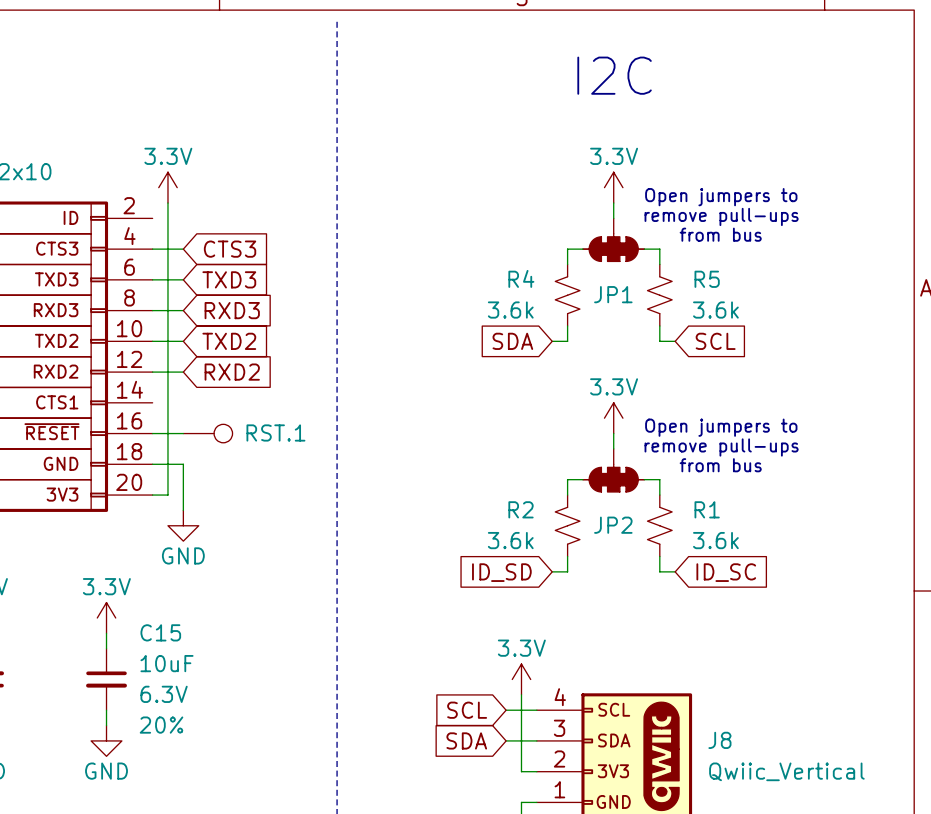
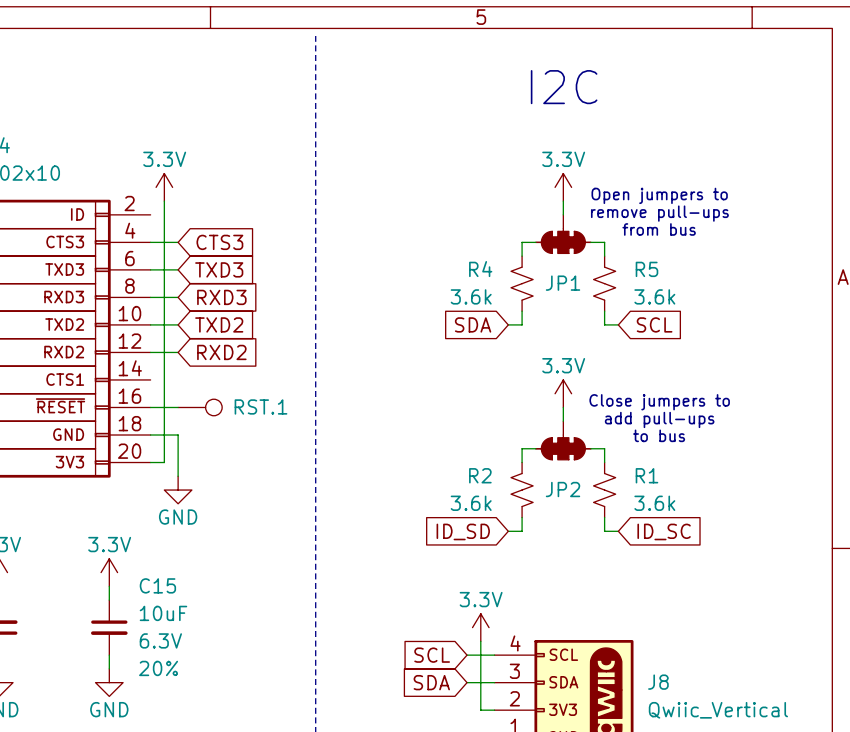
text: Open jumpers to (721, 427) -> Close jumpers to (659, 402)
text: remove pull-ups (721, 447) -> add pull-ups (659, 419)
text: from bus (720, 465) -> to bus (659, 435)

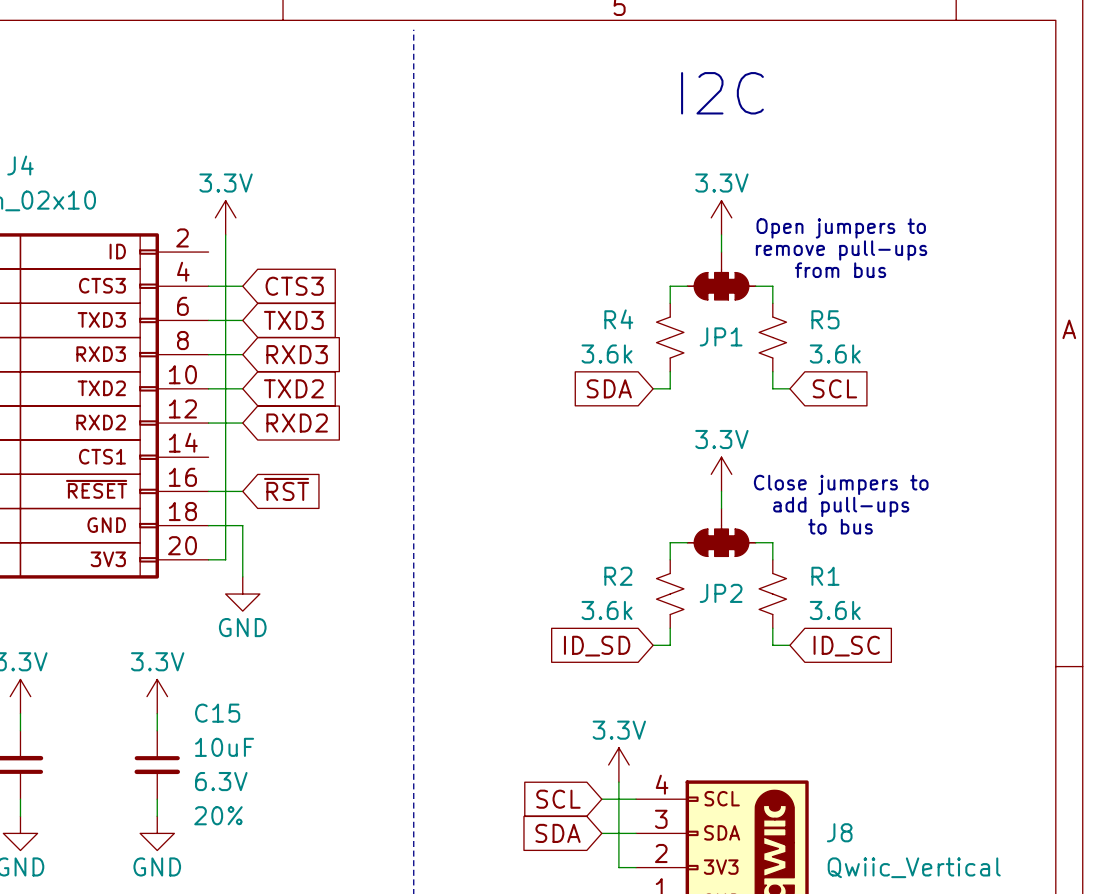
global label: none -> ~{RST} (286, 489)
RST.1: (200, 407) -> none

